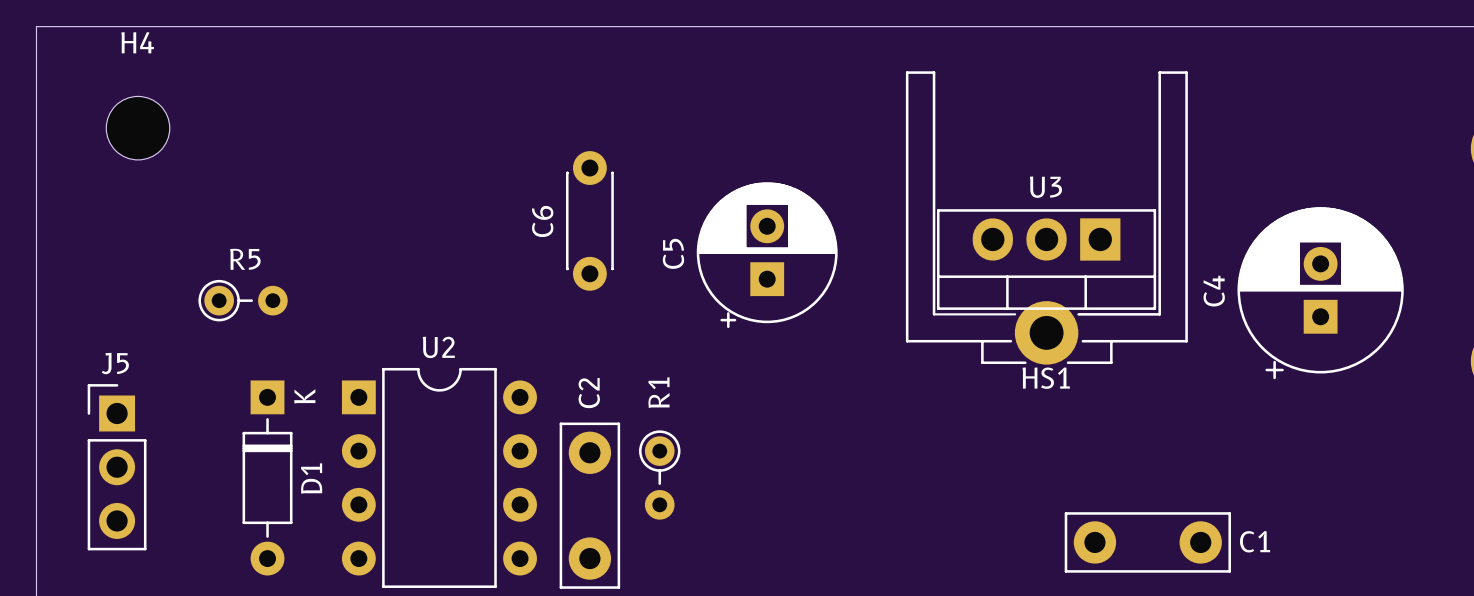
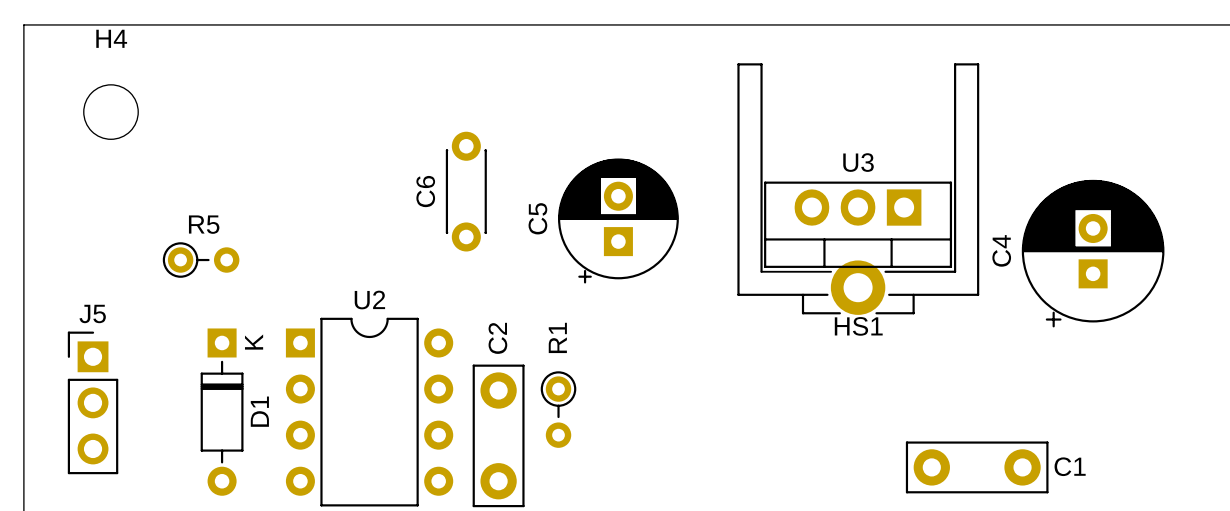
HS1 position: (1046, 217) -> (858, 189)
C6 position: (589, 220) -> (466, 191)
C5 position: (767, 255) -> (618, 220)
U3 position: (1046, 259) -> (858, 224)
C4 position: (1320, 293) -> (1093, 253)

